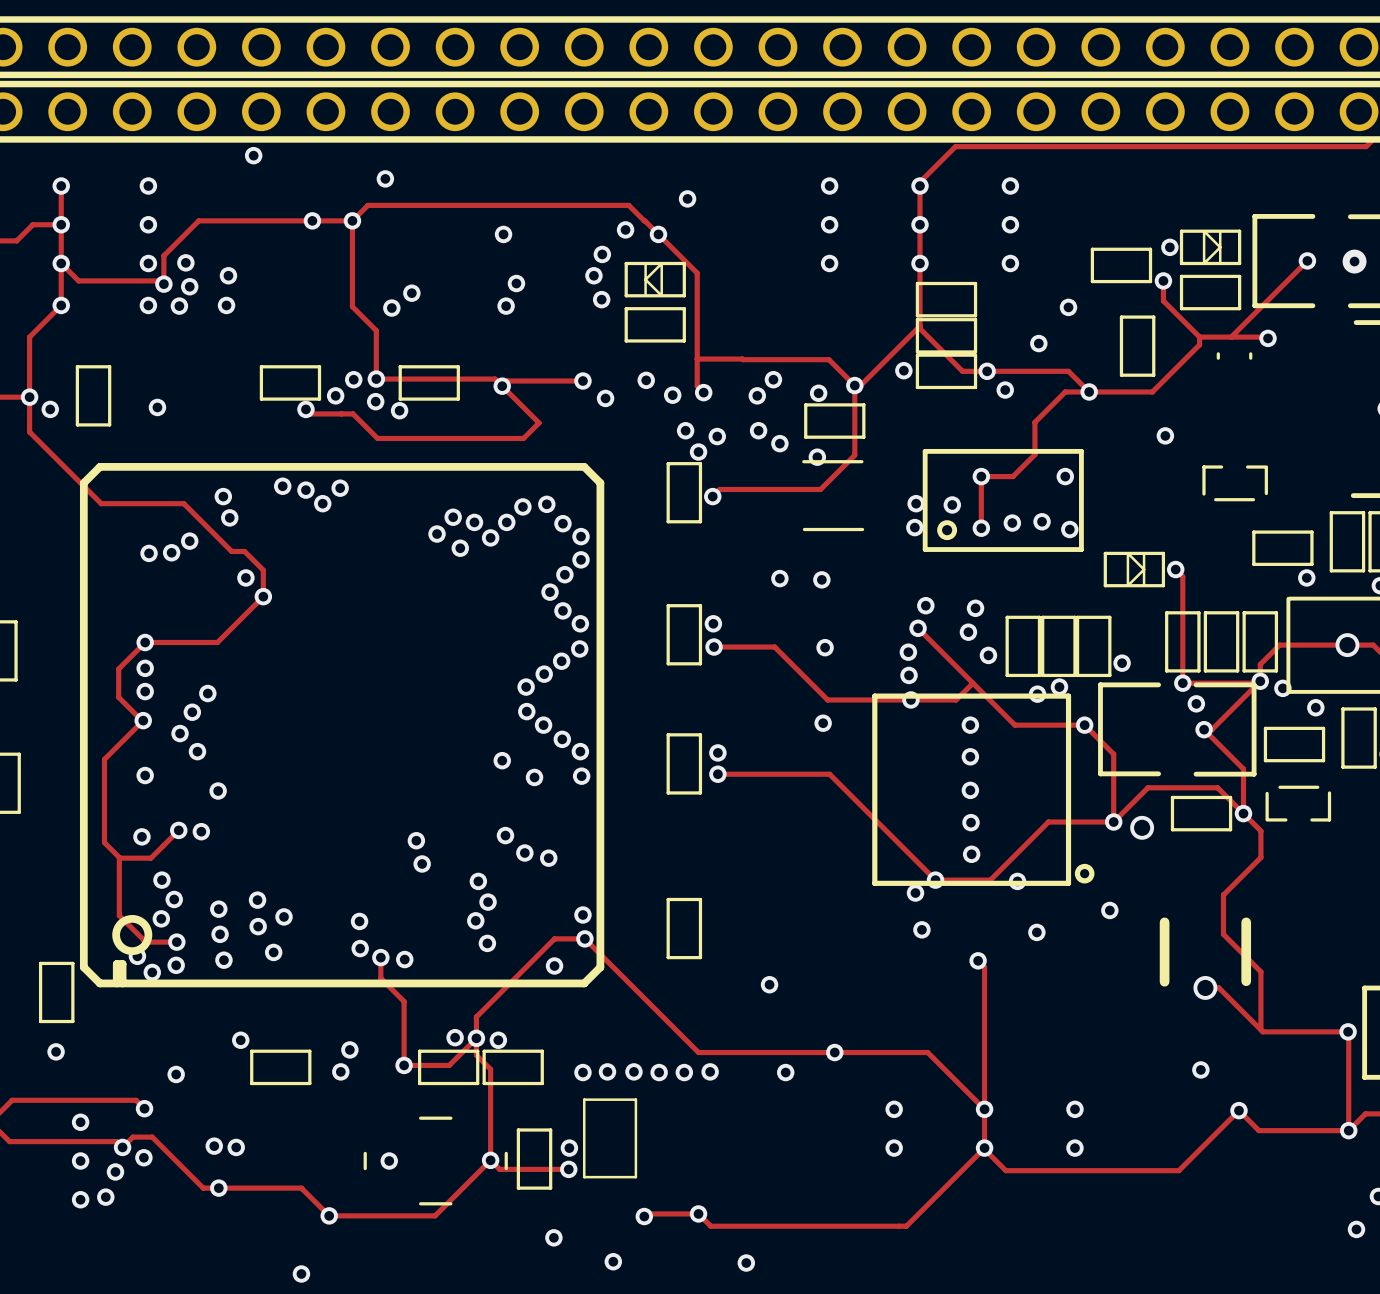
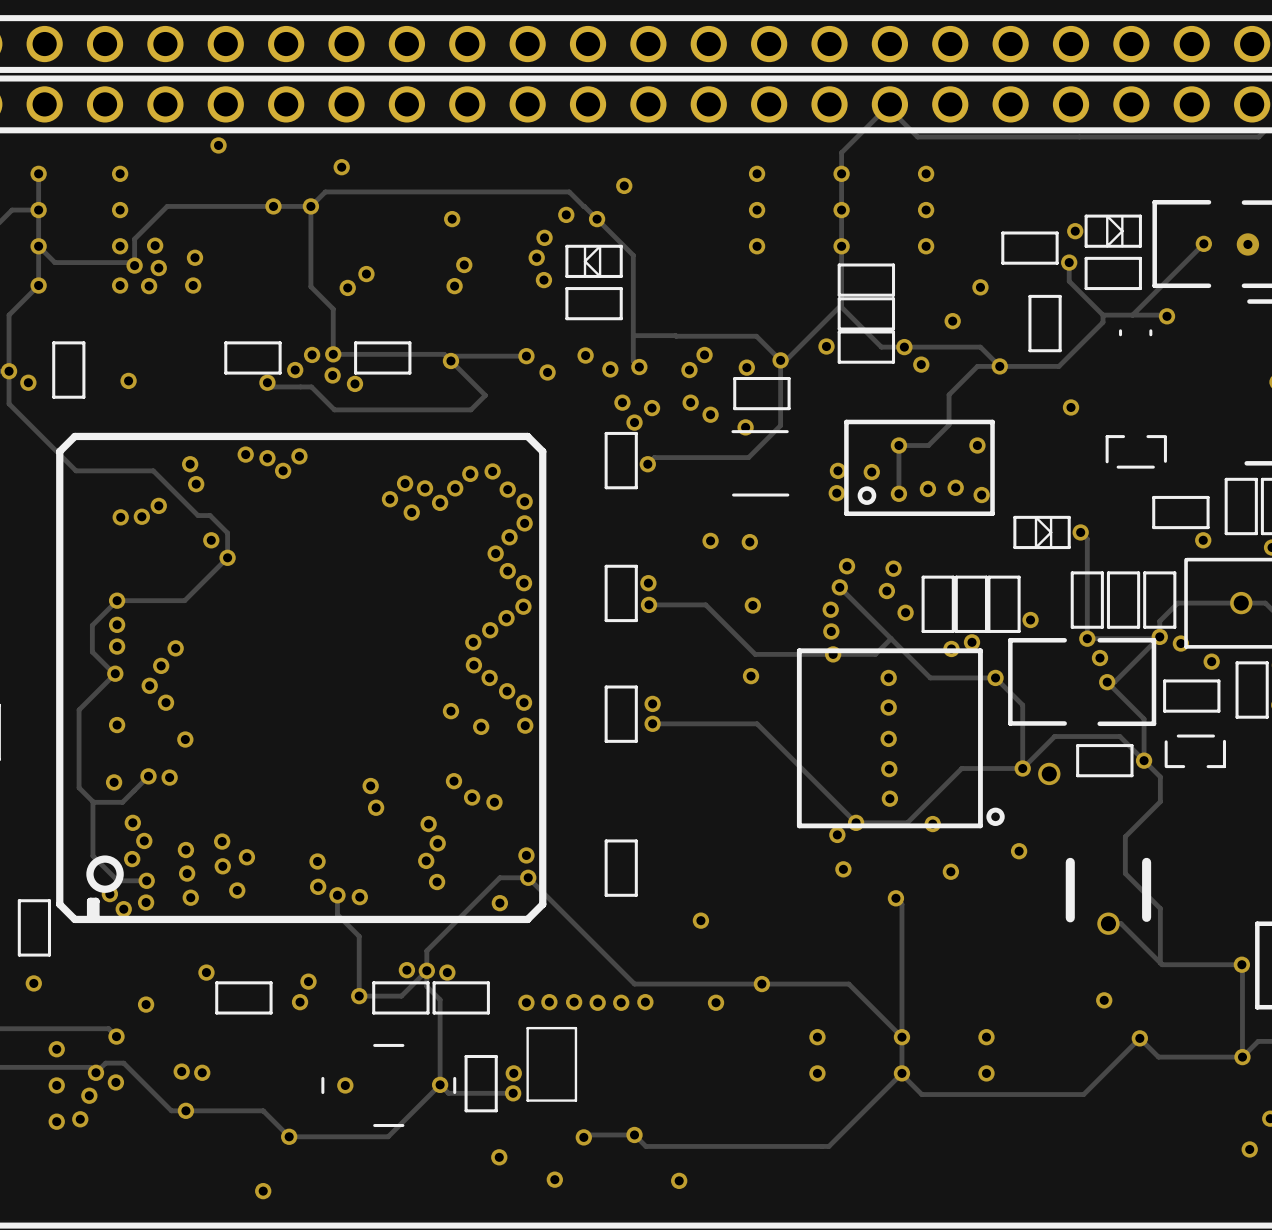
track: (1001, 146) (955, 146) (920, 182) -> (917, 137) (889, 109) (889, 104) (841, 152) (841, 170)

